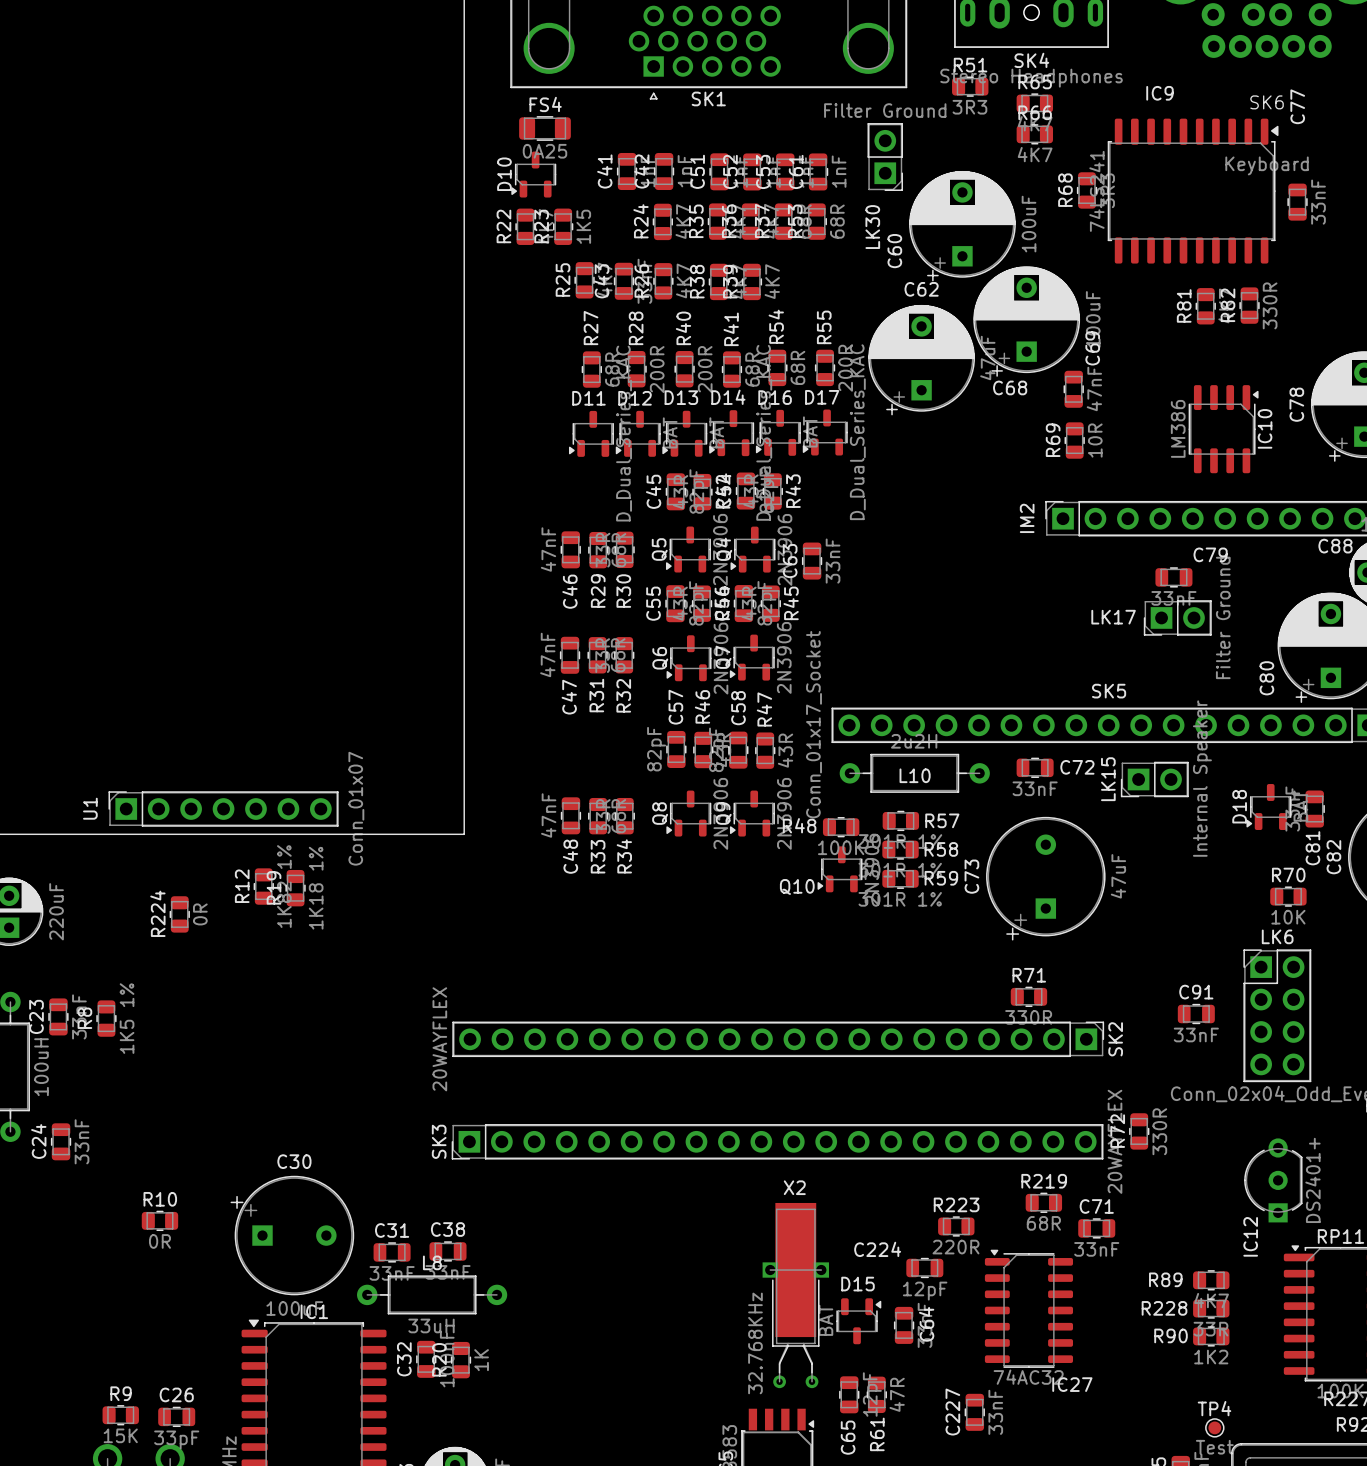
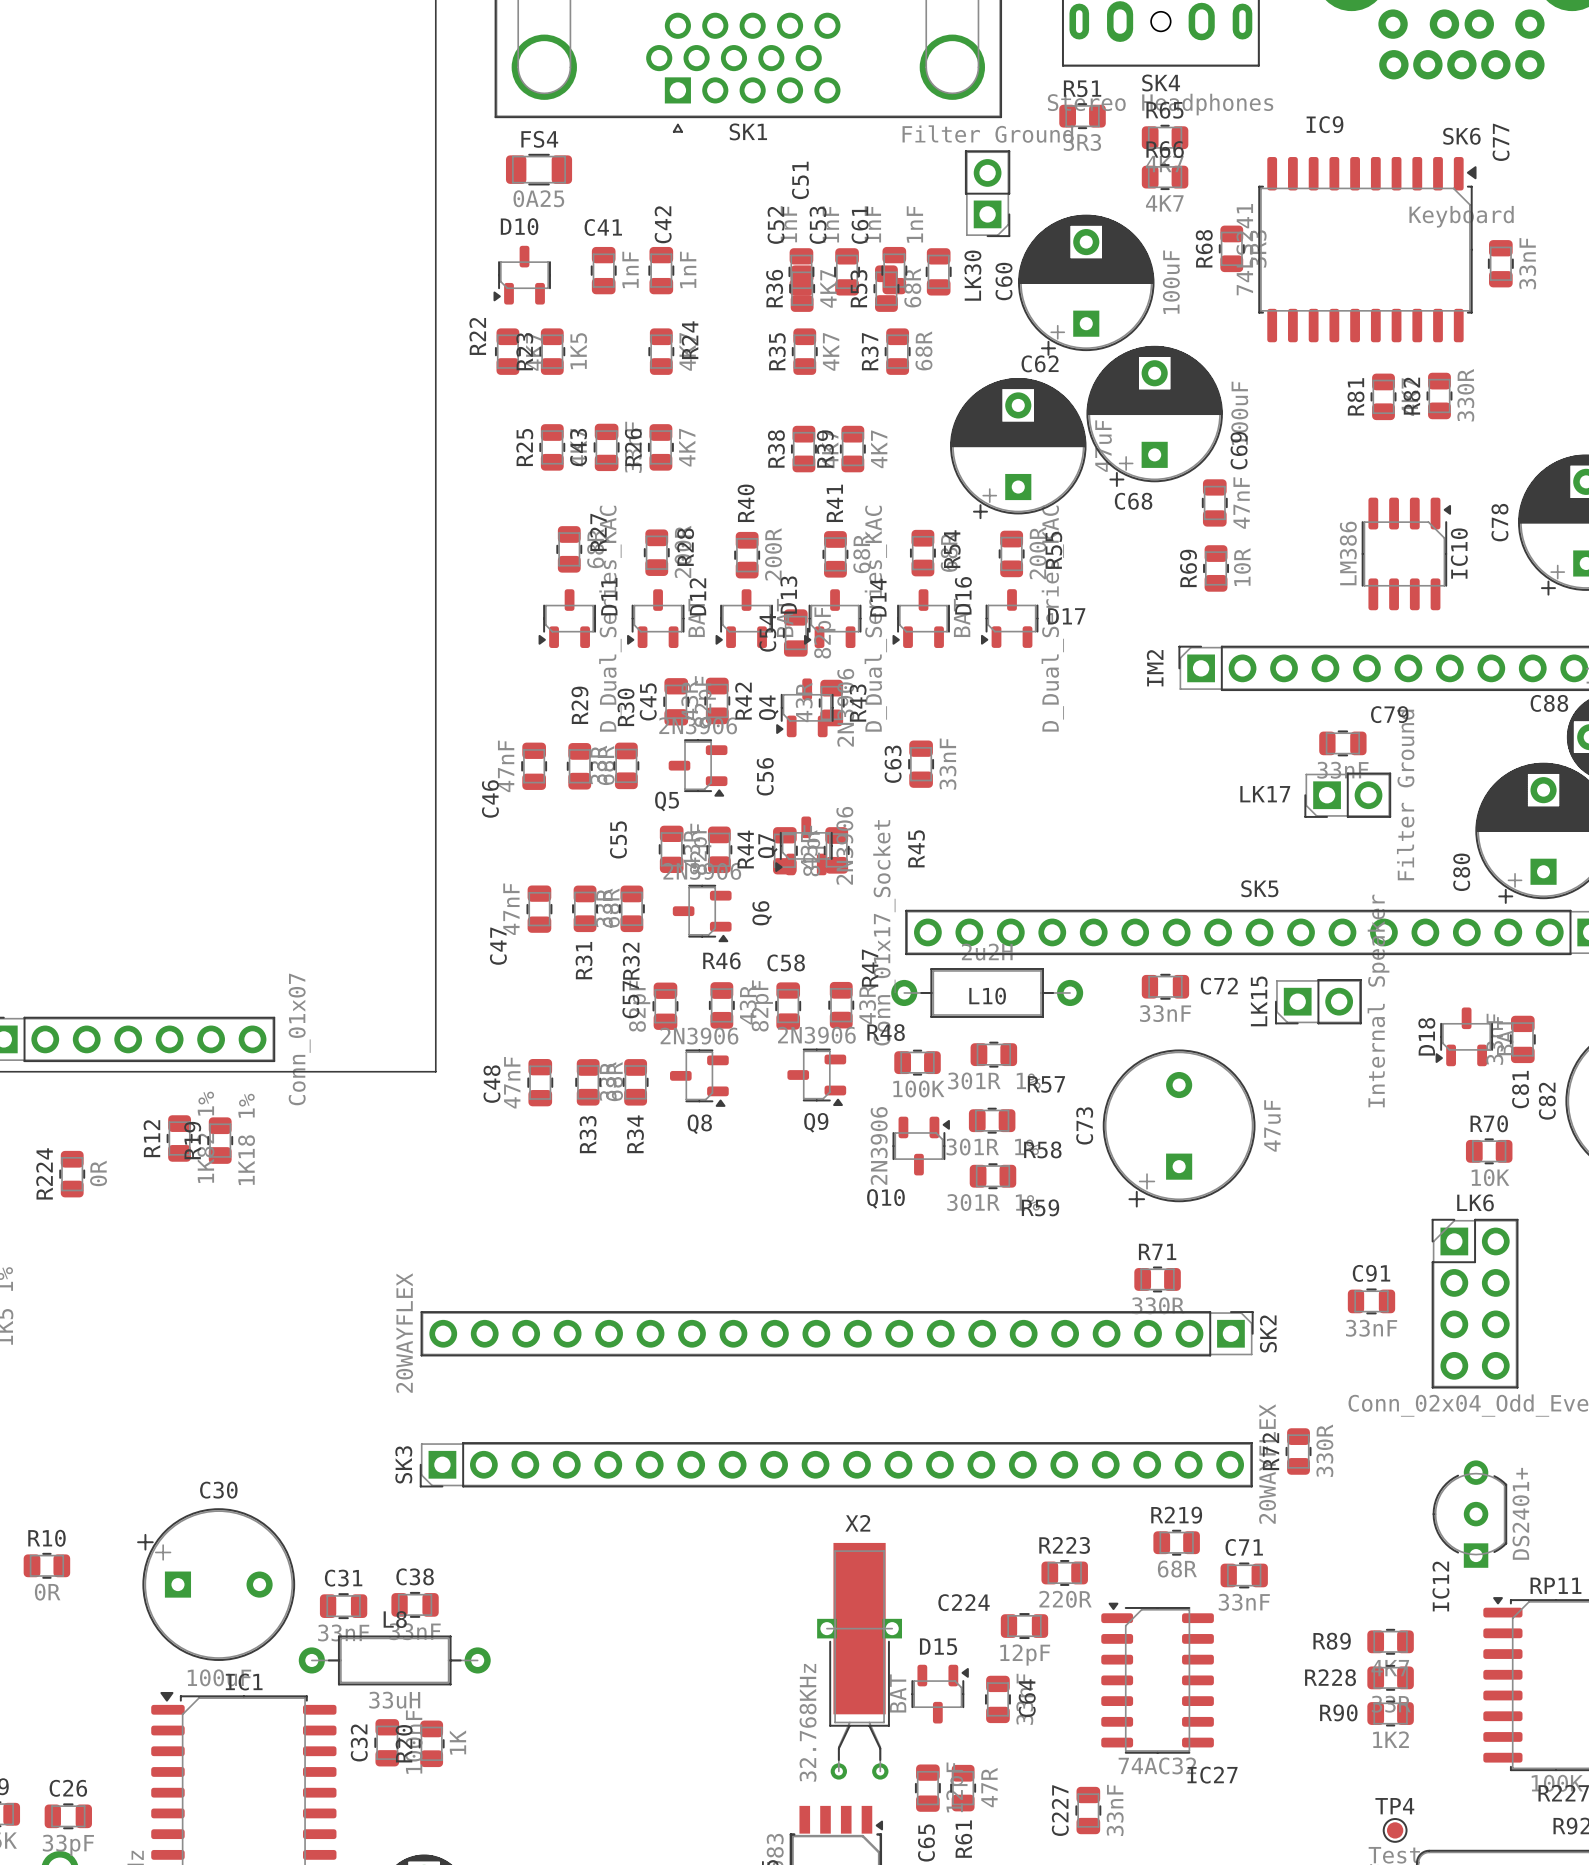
LK30 position: (885, 157) -> (987, 193)
C41 name rotation: 0° (604, 171) -> 90° clockwise (603, 227)
C41 position: (627, 171) -> (603, 270)
C42 position: (664, 171) -> (661, 270)
C51 name position: C51 (697, 171) -> C51 (800, 180)
C51 position: (719, 171) -> (801, 271)
C52 position: (752, 171) -> (847, 271)
C53 position: (785, 171) -> (894, 270)
C61 position: (818, 171) -> (938, 271)
D10 name rotation: 0° (504, 174) -> 90° clockwise (519, 226)
D10 position: (533, 174) -> (522, 275)
R24 name position: R24 (640, 221) -> R24 (690, 340)
R24 position: (662, 221) -> (661, 351)
R35 position: (717, 221) -> (804, 351)
R37 position: (783, 221) -> (897, 351)
R22 name position: R22 (503, 226) -> R22 (477, 336)
R22 position: (525, 226) -> (507, 351)
R23 position: (563, 226) -> (552, 351)
C60 position: (962, 226) -> (1086, 285)
LK30 name position: LK30 (872, 227) -> LK30 (972, 275)
C60 name position: C60 (894, 251) -> C60 (1003, 281)
R25 position: (584, 280) -> (552, 447)
C43 position: (623, 281) -> (606, 447)
R26 position: (663, 281) -> (660, 447)
R38 position: (718, 281) -> (803, 449)
R39 position: (751, 281) -> (852, 449)
C62 name position: C62 (921, 289) -> C62 (1040, 363)
R54 name position: R54 (776, 326) -> R54 (952, 549)
R55 name position: R55 (824, 327) -> R55 (1053, 550)
R27 name position: R27 (591, 328) -> R27 (598, 532)
R28 name position: R28 (636, 328) -> R28 (685, 547)
C62 position: (921, 360) -> (1018, 448)
R54 position: (777, 367) -> (922, 553)
R55 position: (825, 367) -> (1011, 553)
R27 position: (591, 369) -> (569, 549)
R28 position: (636, 369) -> (656, 552)
R40 position: (684, 369) -> (747, 555)
R41 position: (731, 369) -> (835, 554)
D13 name rotation: 0° (681, 397) -> 90° counterclockwise (788, 595)
D14 name rotation: 0° (728, 397) -> 90° counterclockwise (878, 597)
D16 name rotation: 0° (775, 397) -> 90° counterclockwise (963, 595)
D17 name position: D17 (822, 397) -> D17 (1066, 616)
D11 name rotation: 0° (588, 398) -> 90° counterclockwise (609, 596)
D12 name rotation: 0° (635, 398) -> 90° counterclockwise (697, 596)
D16 position: (778, 432) -> (921, 618)
D17 position: (825, 432) -> (1009, 618)
D11 position: (591, 433) -> (567, 618)
D12 position: (638, 433) -> (655, 618)
D13 position: (684, 433) -> (744, 618)
D14 position: (731, 433) -> (832, 618)
C45 position: (675, 491) -> (676, 701)
R43 position: (772, 491) -> (831, 703)
R42 position: (702, 492) -> (717, 700)
C46 position: (570, 549) -> (534, 766)
R30 position: (624, 549) -> (626, 765)
Q5 rotation: 0° (688, 549) -> 90° counterclockwise (698, 767)
Q5 position: (688, 549) -> (698, 767)
R29 position: (598, 550) -> (579, 766)
C63 position: (812, 561) -> (921, 764)
C46 name position: C46 (569, 591) -> C46 (490, 799)
R29 name position: R29 (598, 591) -> R29 (579, 705)
R30 name position: R30 (623, 591) -> R30 (625, 707)
C55 name position: C55 (653, 603) -> C55 (618, 839)
C55 position: (675, 603) -> (671, 849)
R44 position: (702, 603) -> (719, 849)
C56 position: (743, 603) -> (784, 850)
R45 position: (770, 603) -> (836, 850)
R45 name position: R45 (791, 603) -> R45 (916, 848)
C47 position: (570, 655) -> (539, 909)
R31 position: (597, 655) -> (585, 908)
R32 position: (624, 655) -> (631, 908)
Q6 name position: Q6 (660, 658) -> Q6 (762, 913)
Q6 rotation: 0° (689, 658) -> 90° counterclockwise (702, 913)
Q6 position: (689, 658) -> (702, 913)
C47 name position: C47 (569, 697) -> C47 (498, 946)
R46 name rotation: 0° (702, 706) -> 90° clockwise (721, 960)
C57 name position: C57 (675, 707) -> C57 (630, 999)
C58 name rotation: 0° (738, 708) -> 90° clockwise (786, 962)
R47 name position: R47 (764, 709) -> R47 (870, 968)
C57 position: (676, 749) -> (665, 1006)
R46 position: (703, 750) -> (721, 1005)
C58 position: (738, 750) -> (788, 1006)
R47 position: (765, 750) -> (841, 1005)
L10 position: (914, 773) -> (987, 992)
Q8 rotation: 0° (688, 813) -> 90° counterclockwise (699, 1078)
Q8 position: (688, 813) -> (699, 1078)
Q9 rotation: 0° (752, 813) -> 90° counterclockwise (816, 1077)
C48 position: (570, 815) -> (540, 1082)
R33 position: (598, 816) -> (588, 1082)
R34 position: (624, 816) -> (635, 1082)
R57 name position: R57 (942, 820) -> R57 (1046, 1084)
R48 name position: R48 (799, 825) -> R48 (886, 1032)
R58 position: (900, 849) -> (992, 1120)
R58 name position: R58 (941, 849) -> R58 (1042, 1149)
C48 name position: C48 (570, 856) -> C48 (491, 1084)
Q10 rotation: 0° (840, 869) -> 180° (921, 1146)
R59 position: (900, 878) -> (992, 1176)
R59 name position: R59 (941, 878) -> R59 (1040, 1207)
Q10 name position: Q10 (797, 886) -> Q10 (885, 1198)

